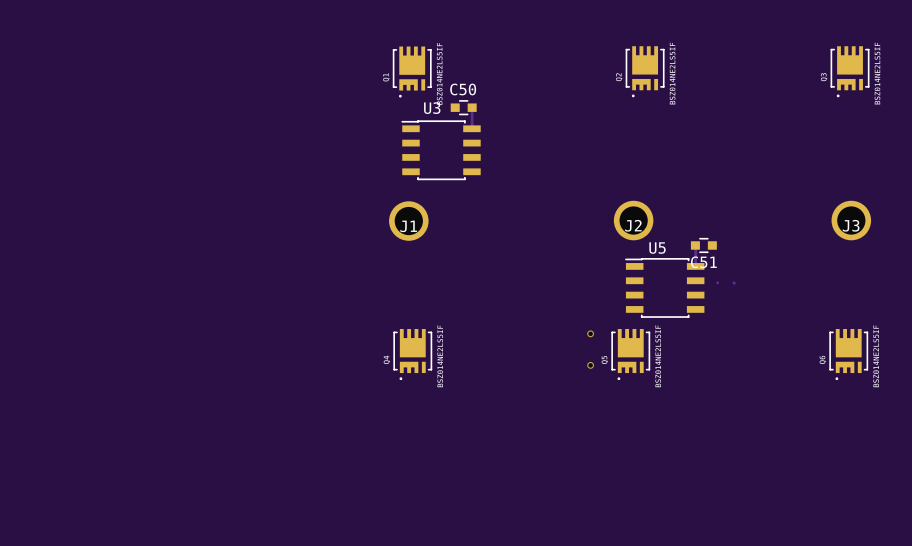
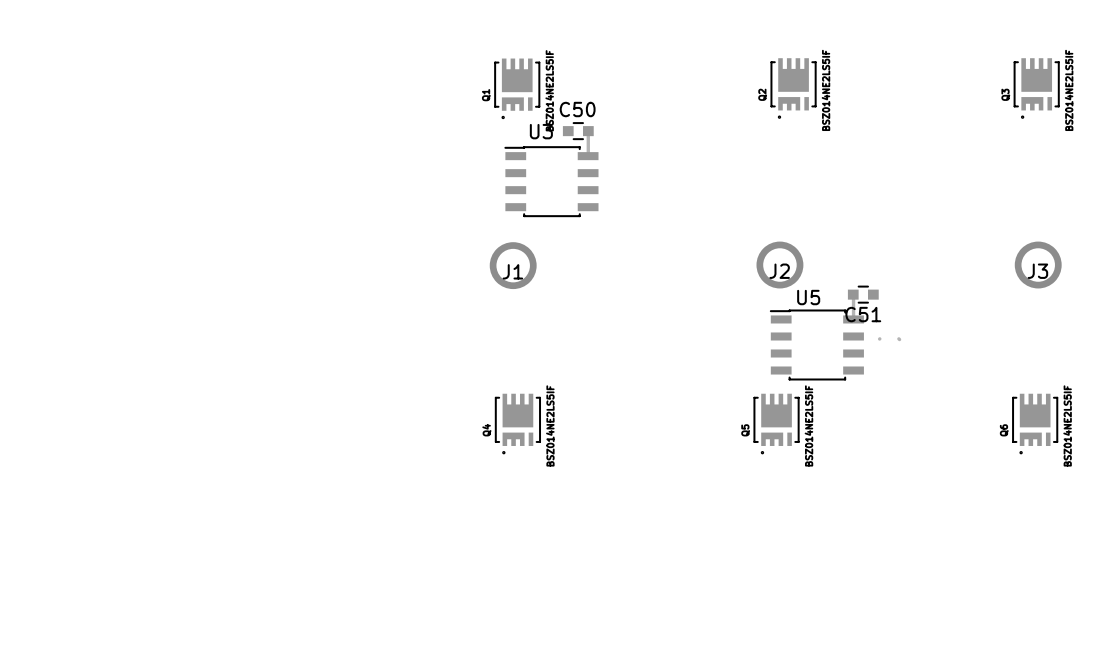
via: (590, 333) -> none
via: (590, 365) -> none

